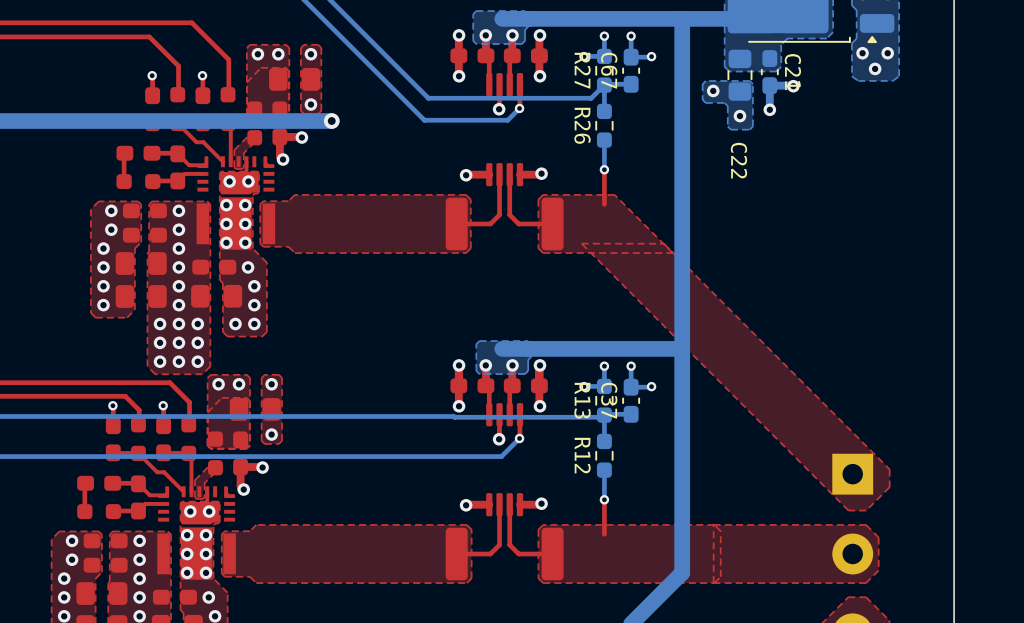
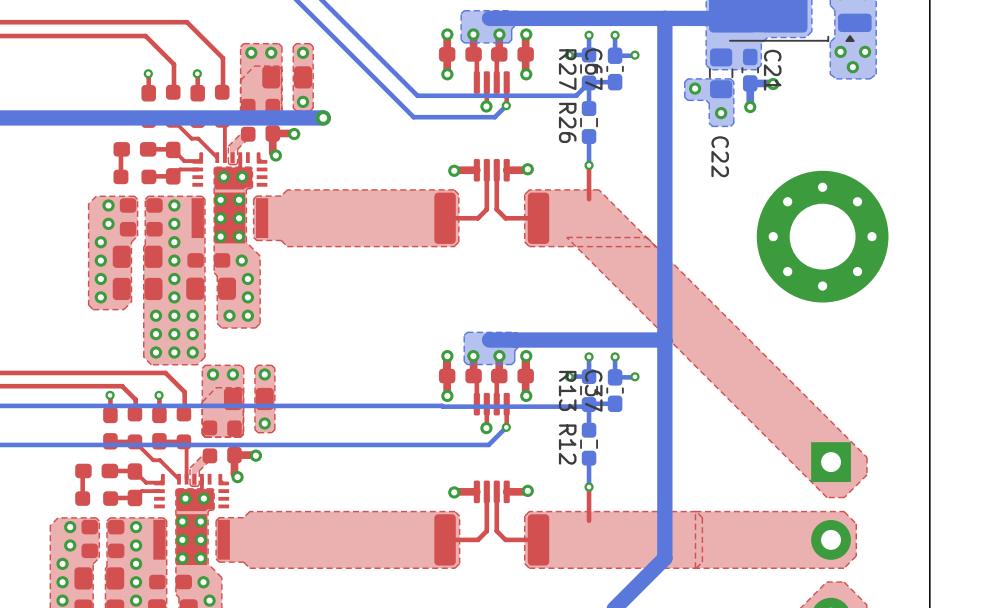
part footprint: [196, 156, 276, 250] -> [191, 152, 269, 244]
part: none -> (822, 236)
part footprint: [157, 486, 236, 580] -> [153, 473, 230, 566]

